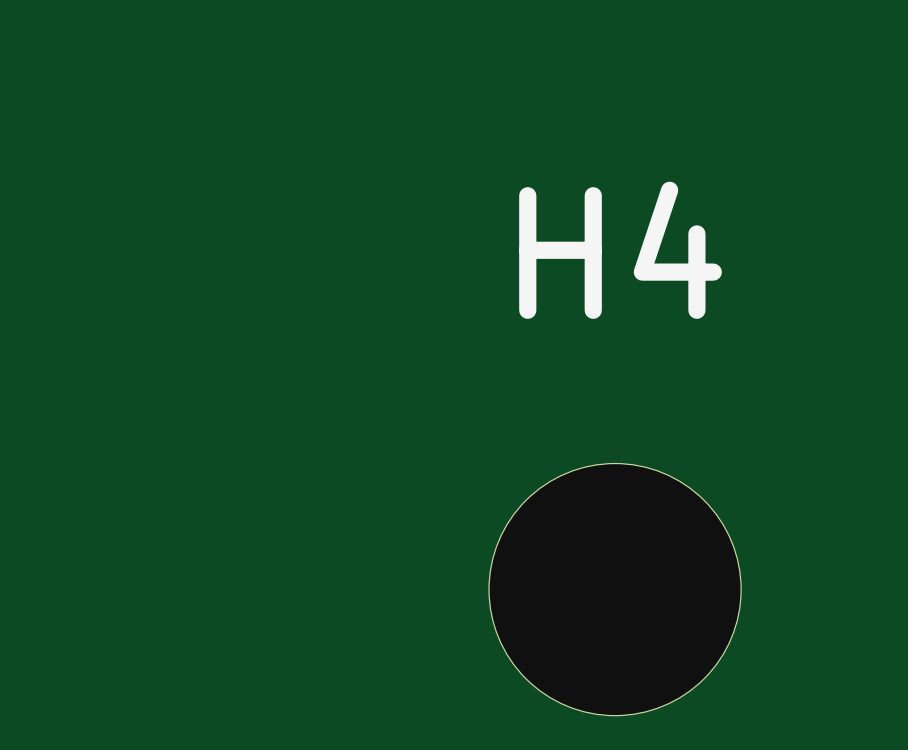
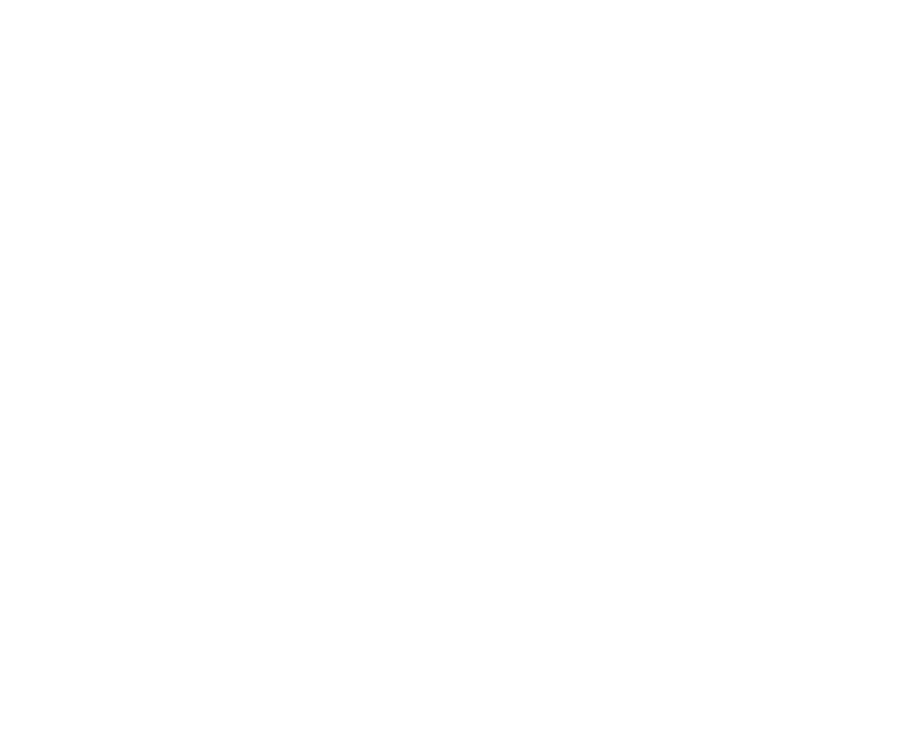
H4: (615, 589) -> none

